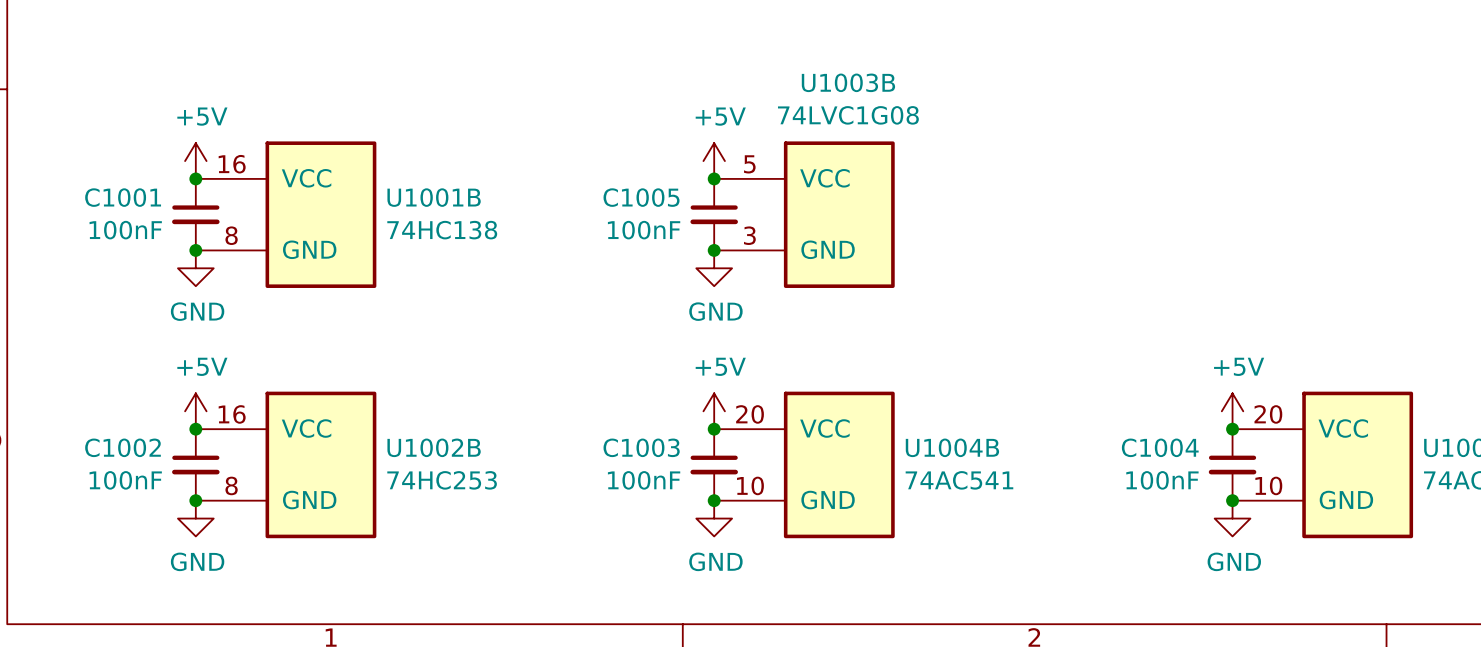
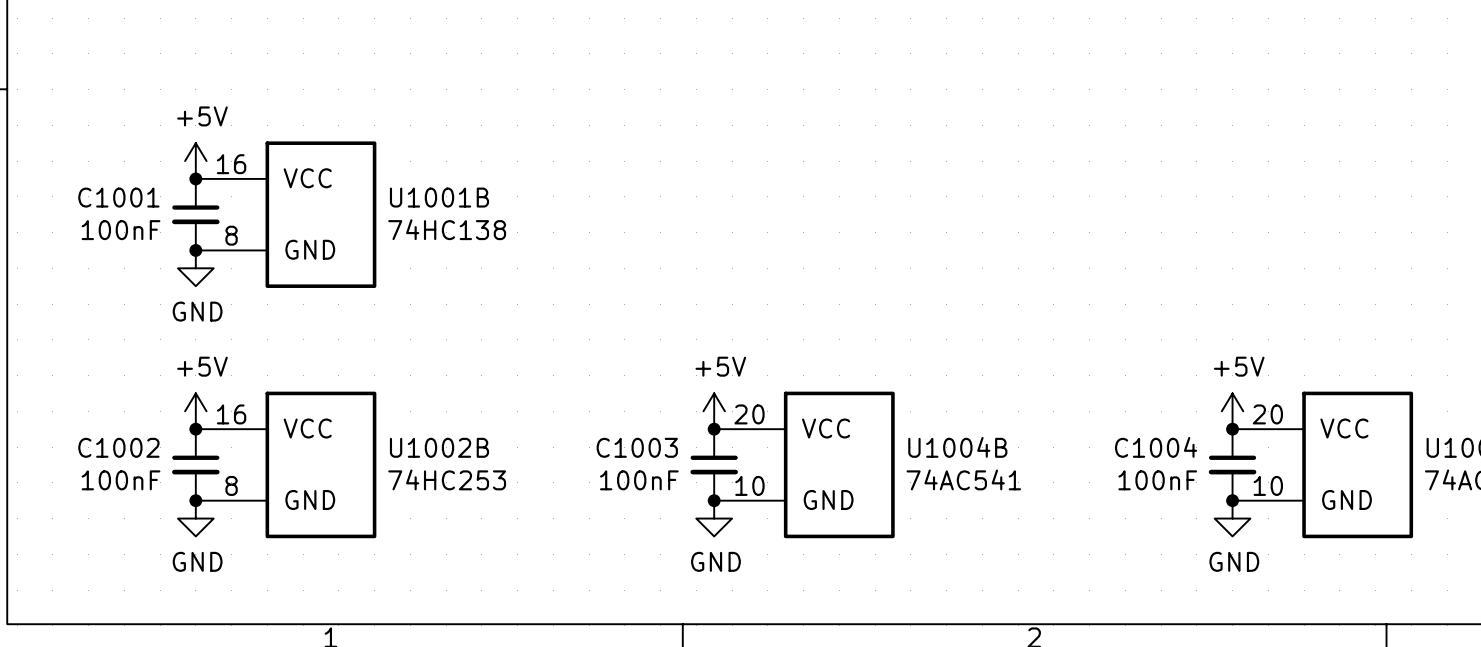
power symbol: +5V (714, 161) -> none
junction: (714, 178) -> none
C1005: 100nF (714, 214) -> none
U1003B: 74LVC1G08 (804, 214) -> none
junction: (714, 250) -> none
power symbol: GND (714, 268) -> none

